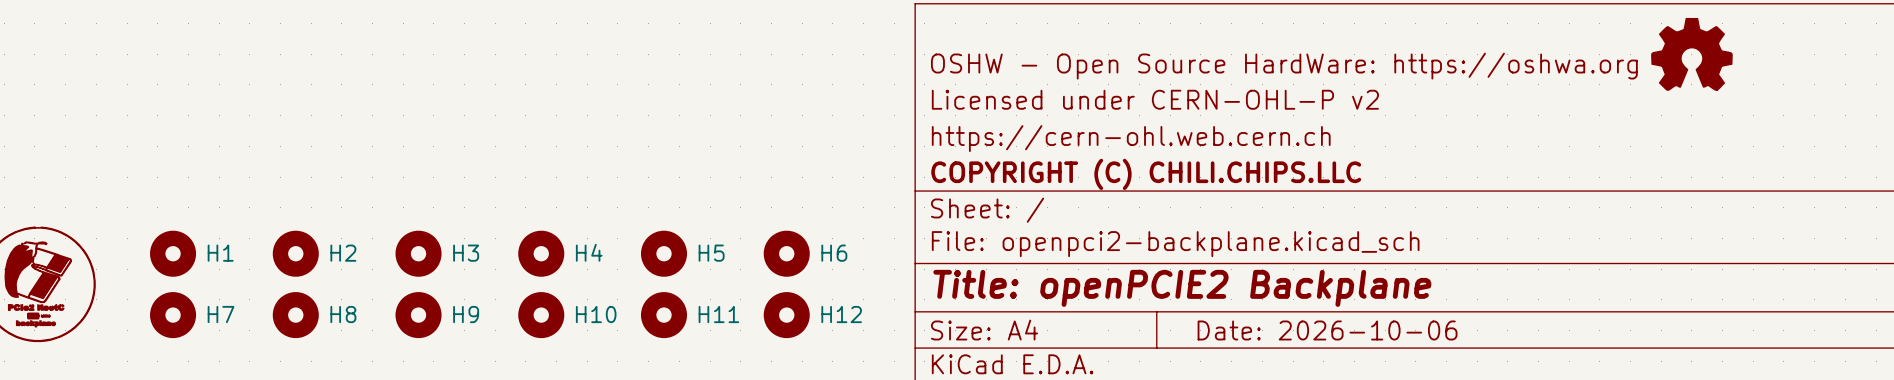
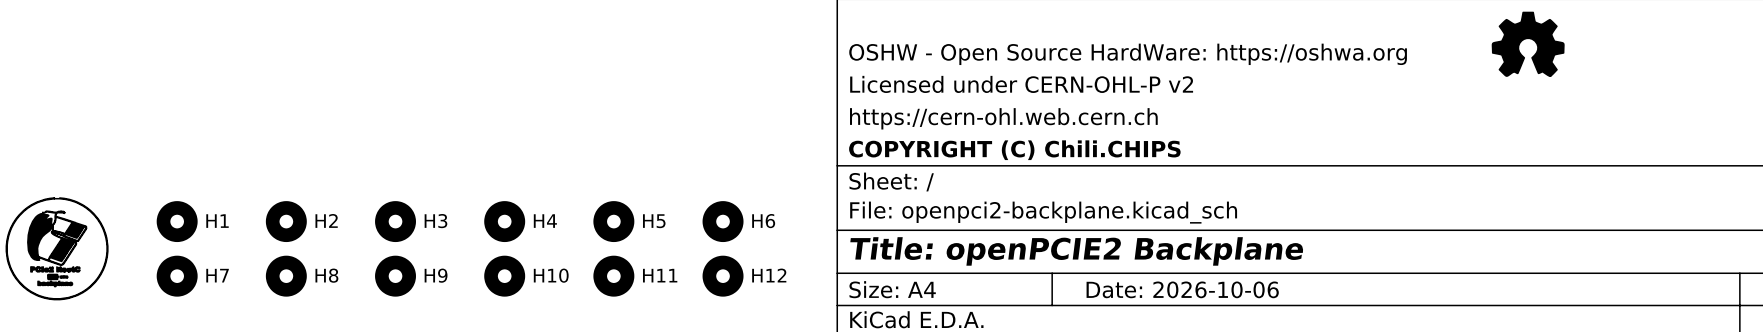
title block: COPYRIGHT (C) CHILI.CHIPS.LLC (1146, 174) -> COPYRIGHT (C) Chili.CHIPS (1014, 150)

